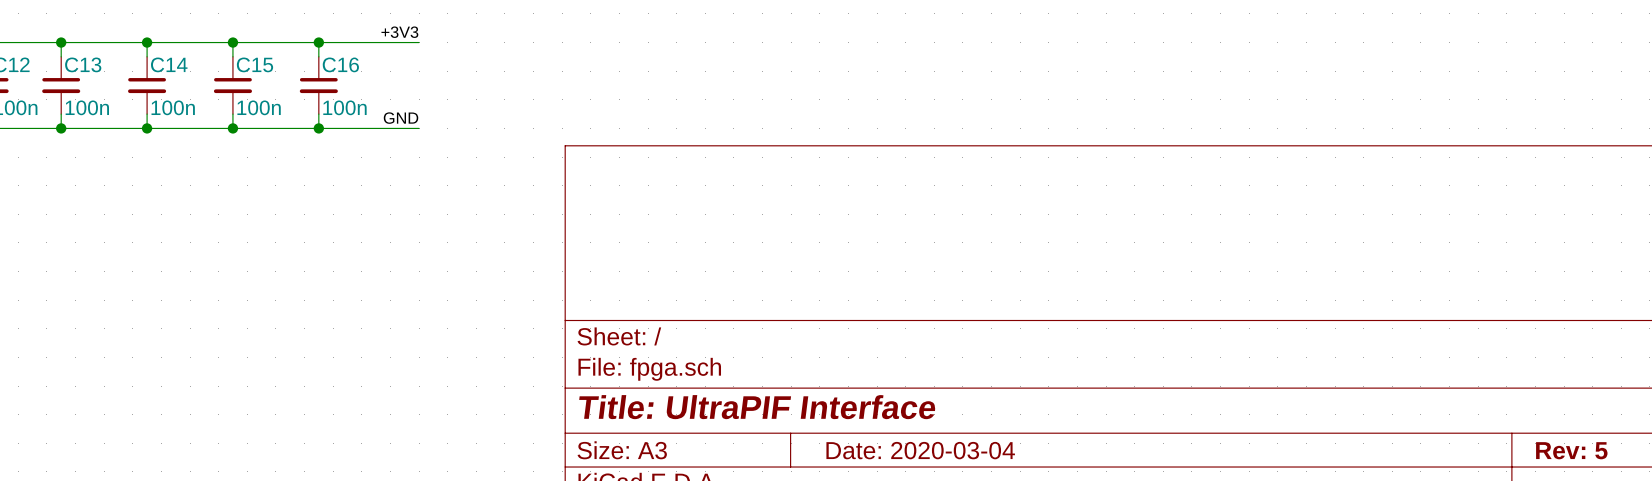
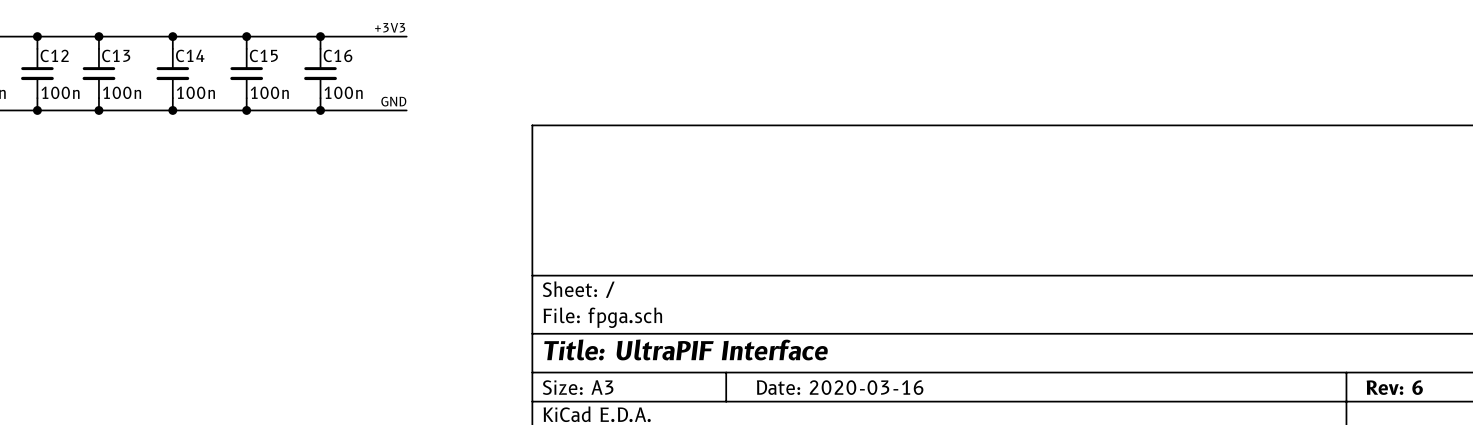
title block: Date: 2020-03-04 (920, 450) -> Date: 2020-03-16 (840, 387)
title block: Rev: 5 (1571, 450) -> Rev: 6 (1394, 387)

